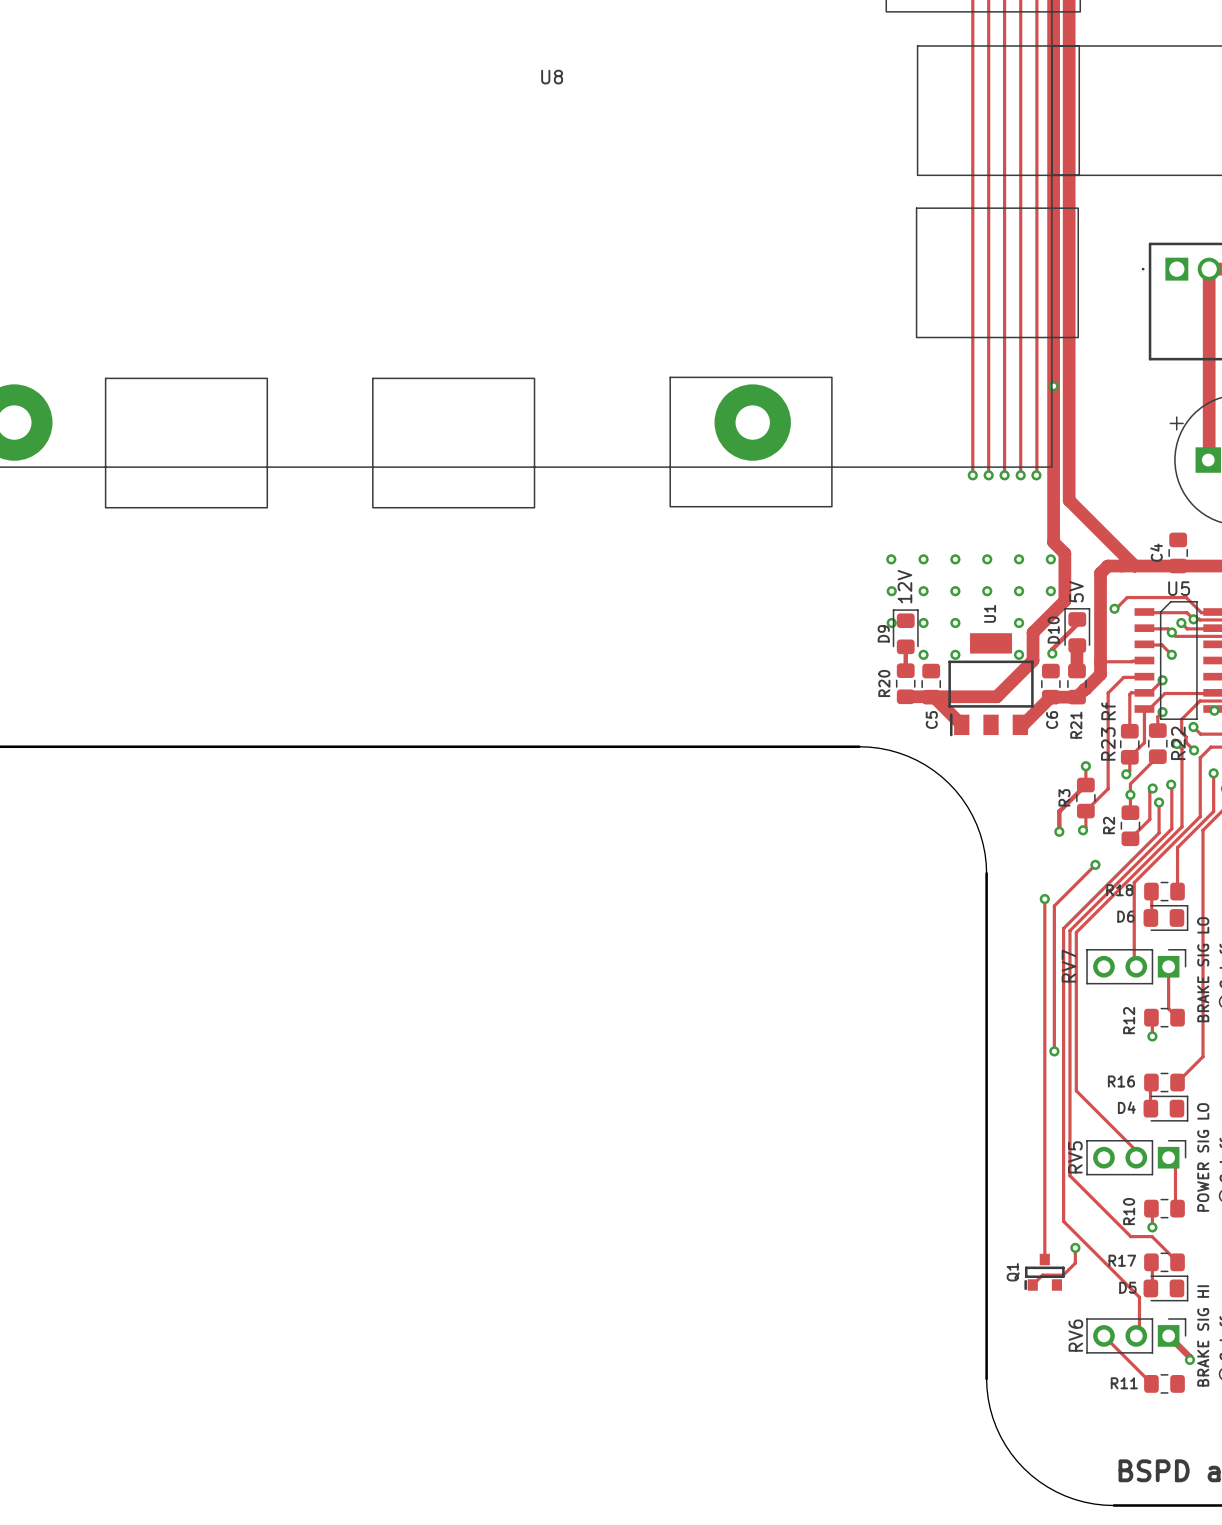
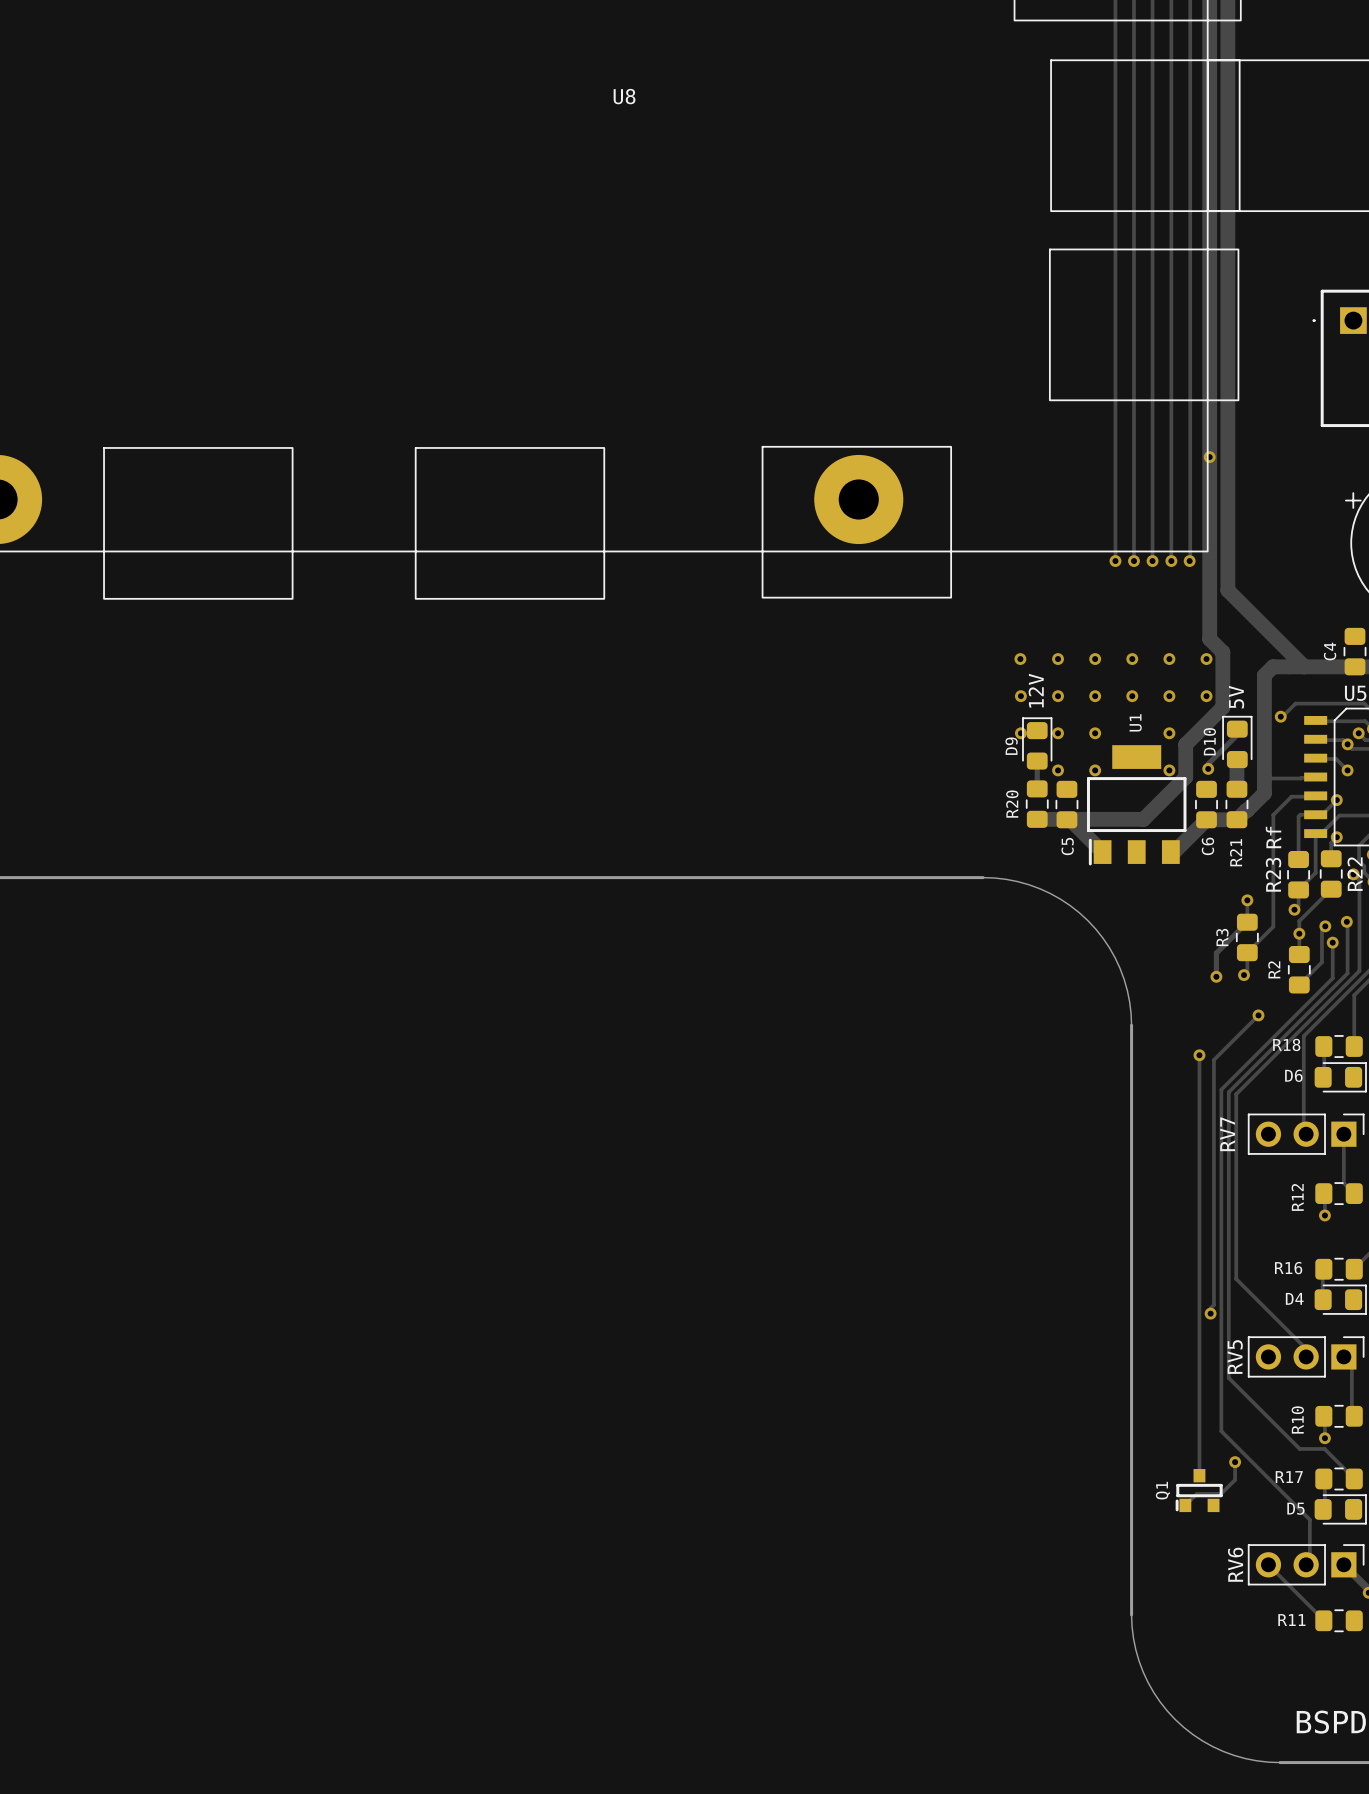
track: (1057, 903) (1054, 905) (1054, 1051) -> (1213, 1059) (1213, 1304) (1210, 1308) (1210, 1313)
via position: (1054, 1051) -> (1210, 1313)

